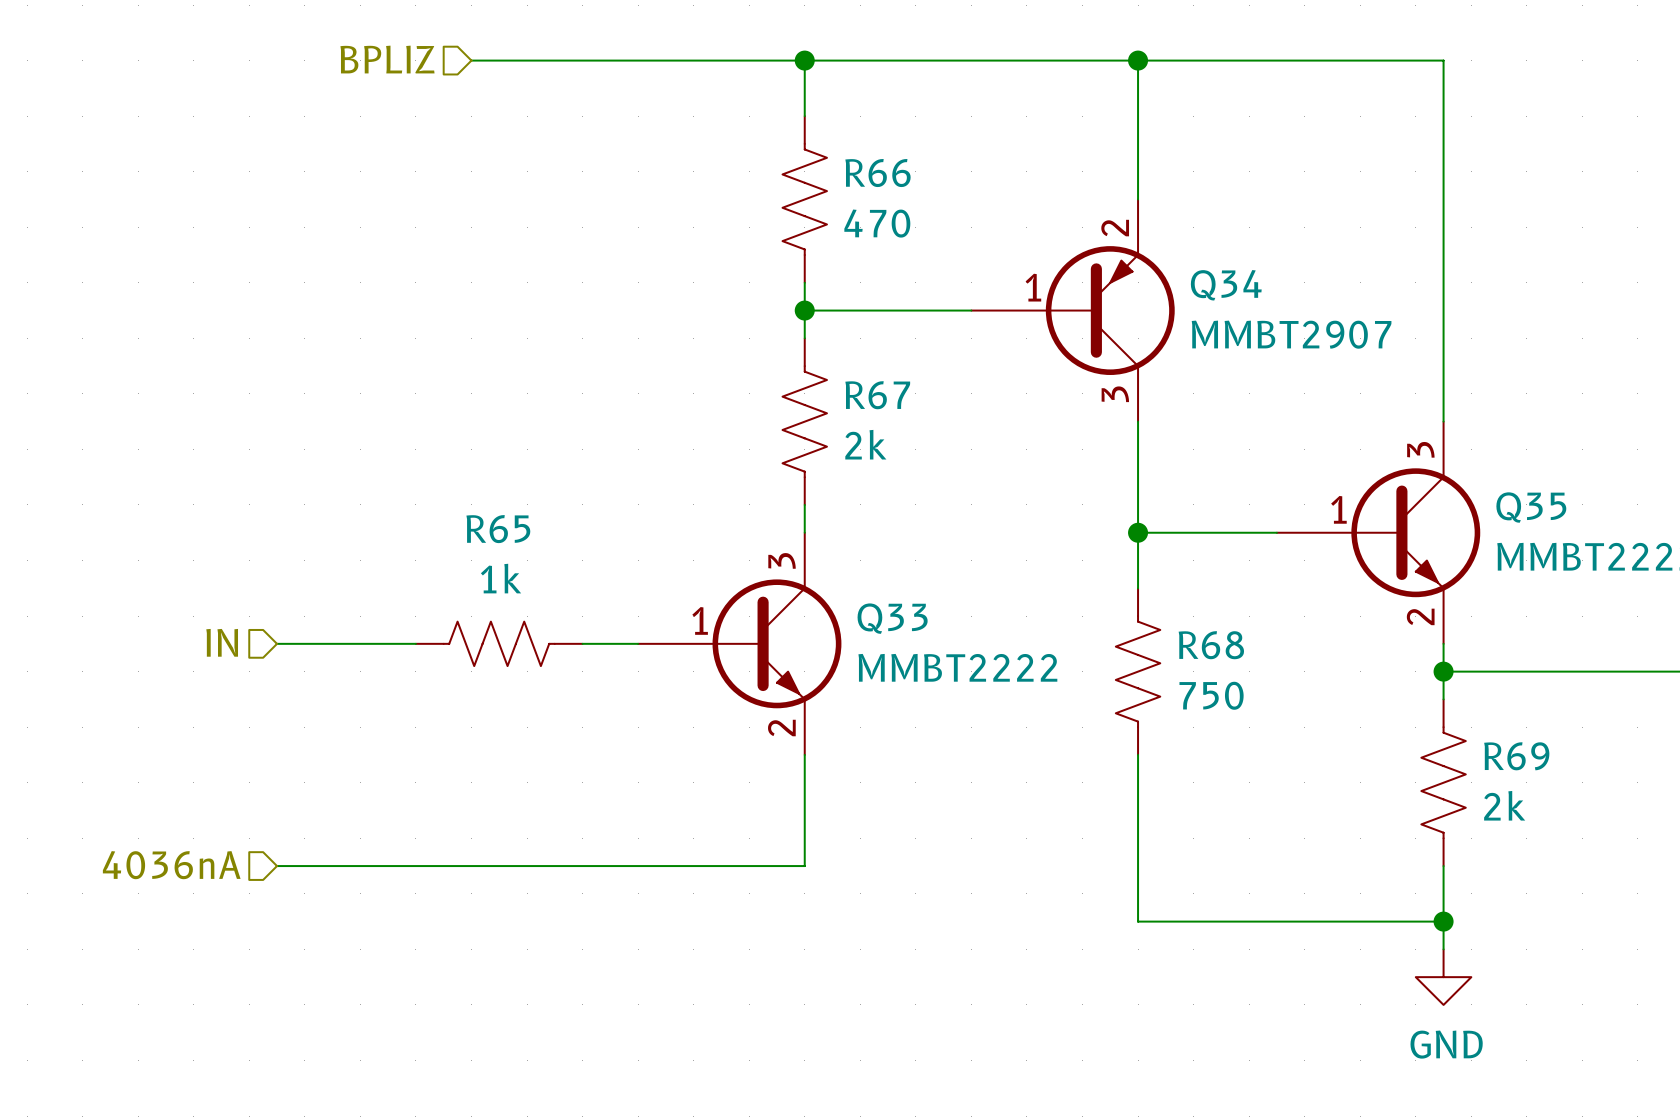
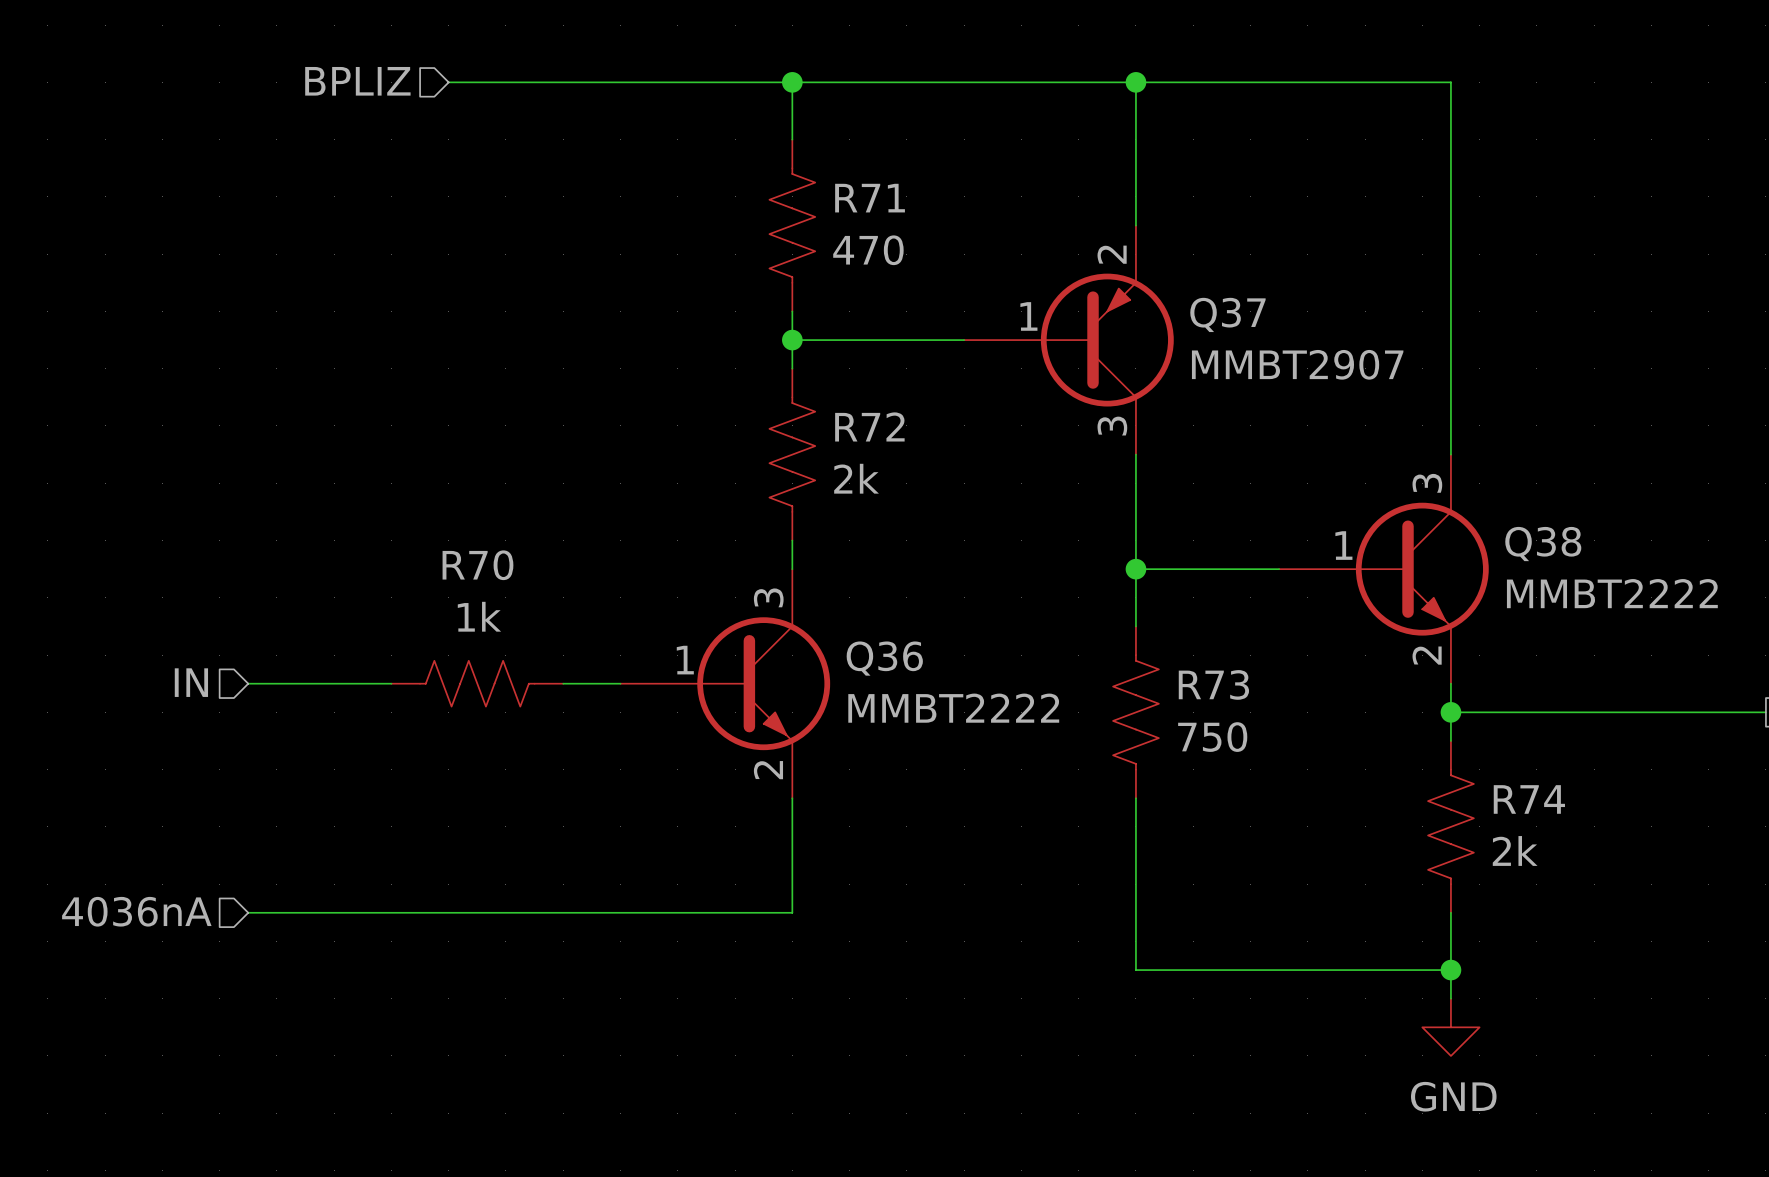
R66 name: R66 (877, 173) -> R71 (870, 198)
Q34 name: Q34 (1226, 285) -> Q37 (1227, 314)
R67 name: R67 (877, 395) -> R72 (869, 426)
Q35 name: Q35 (1531, 507) -> Q38 (1543, 544)
R65 name: R65 (498, 529) -> R70 (477, 565)
Q33 name: Q33 (892, 618) -> Q36 (884, 658)
R68 name: R68 (1211, 645) -> R73 (1213, 684)
R69 name: R69 (1516, 756) -> R74 (1529, 799)

